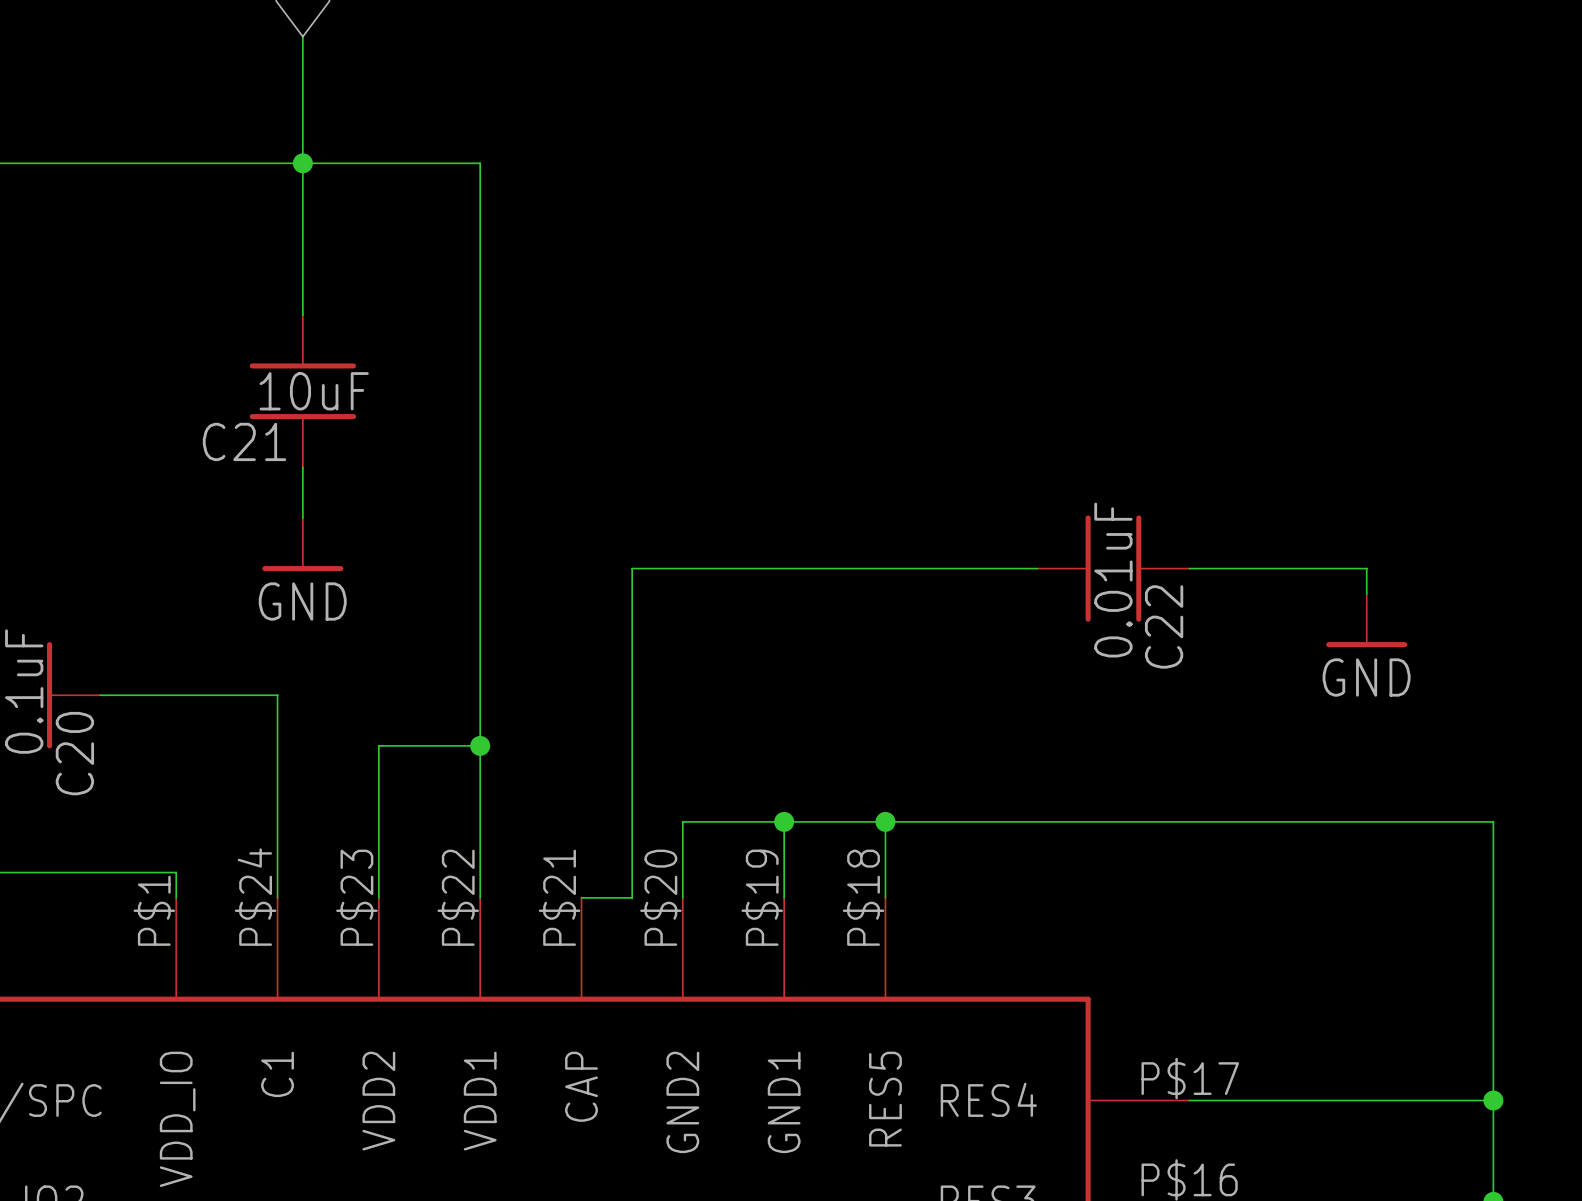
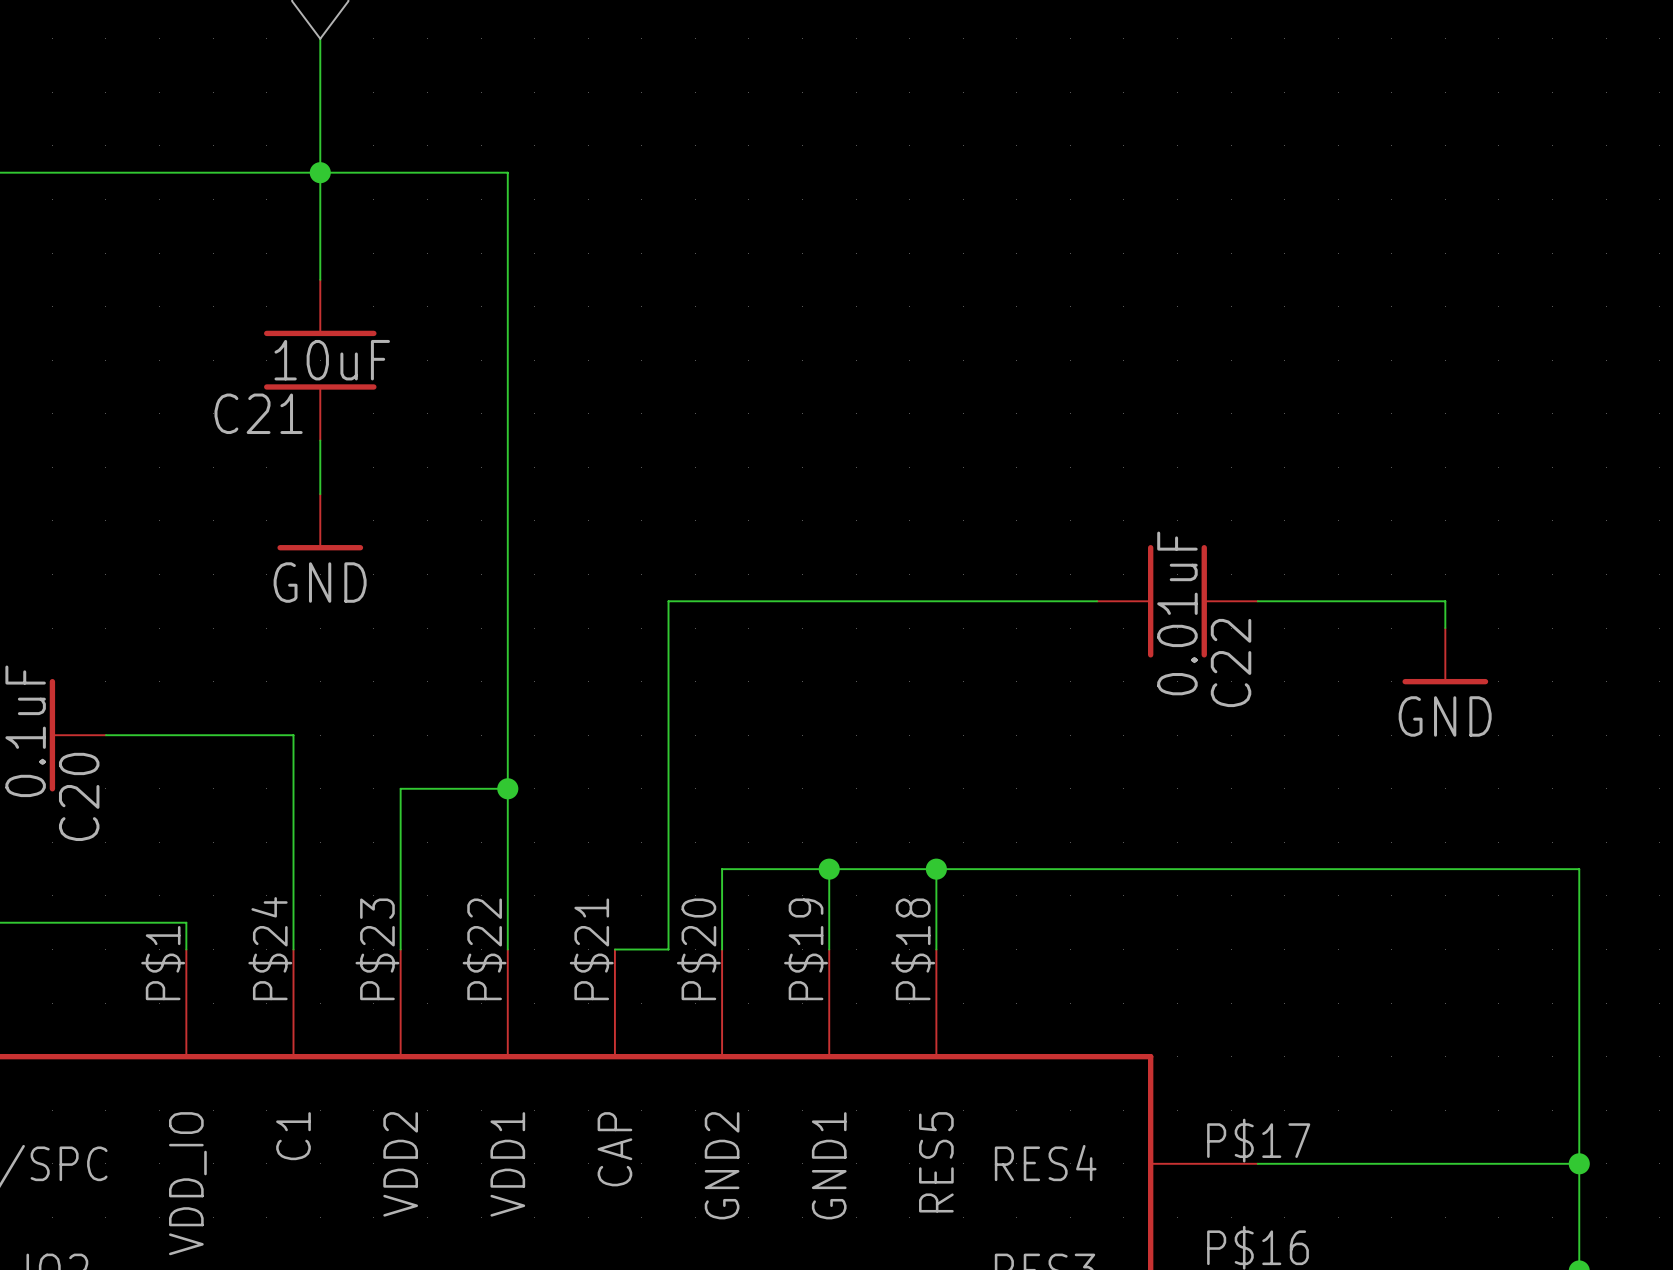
C21 position: (302, 391) -> (320, 360)
power symbol position: GND (302, 544) -> GND (320, 522)

